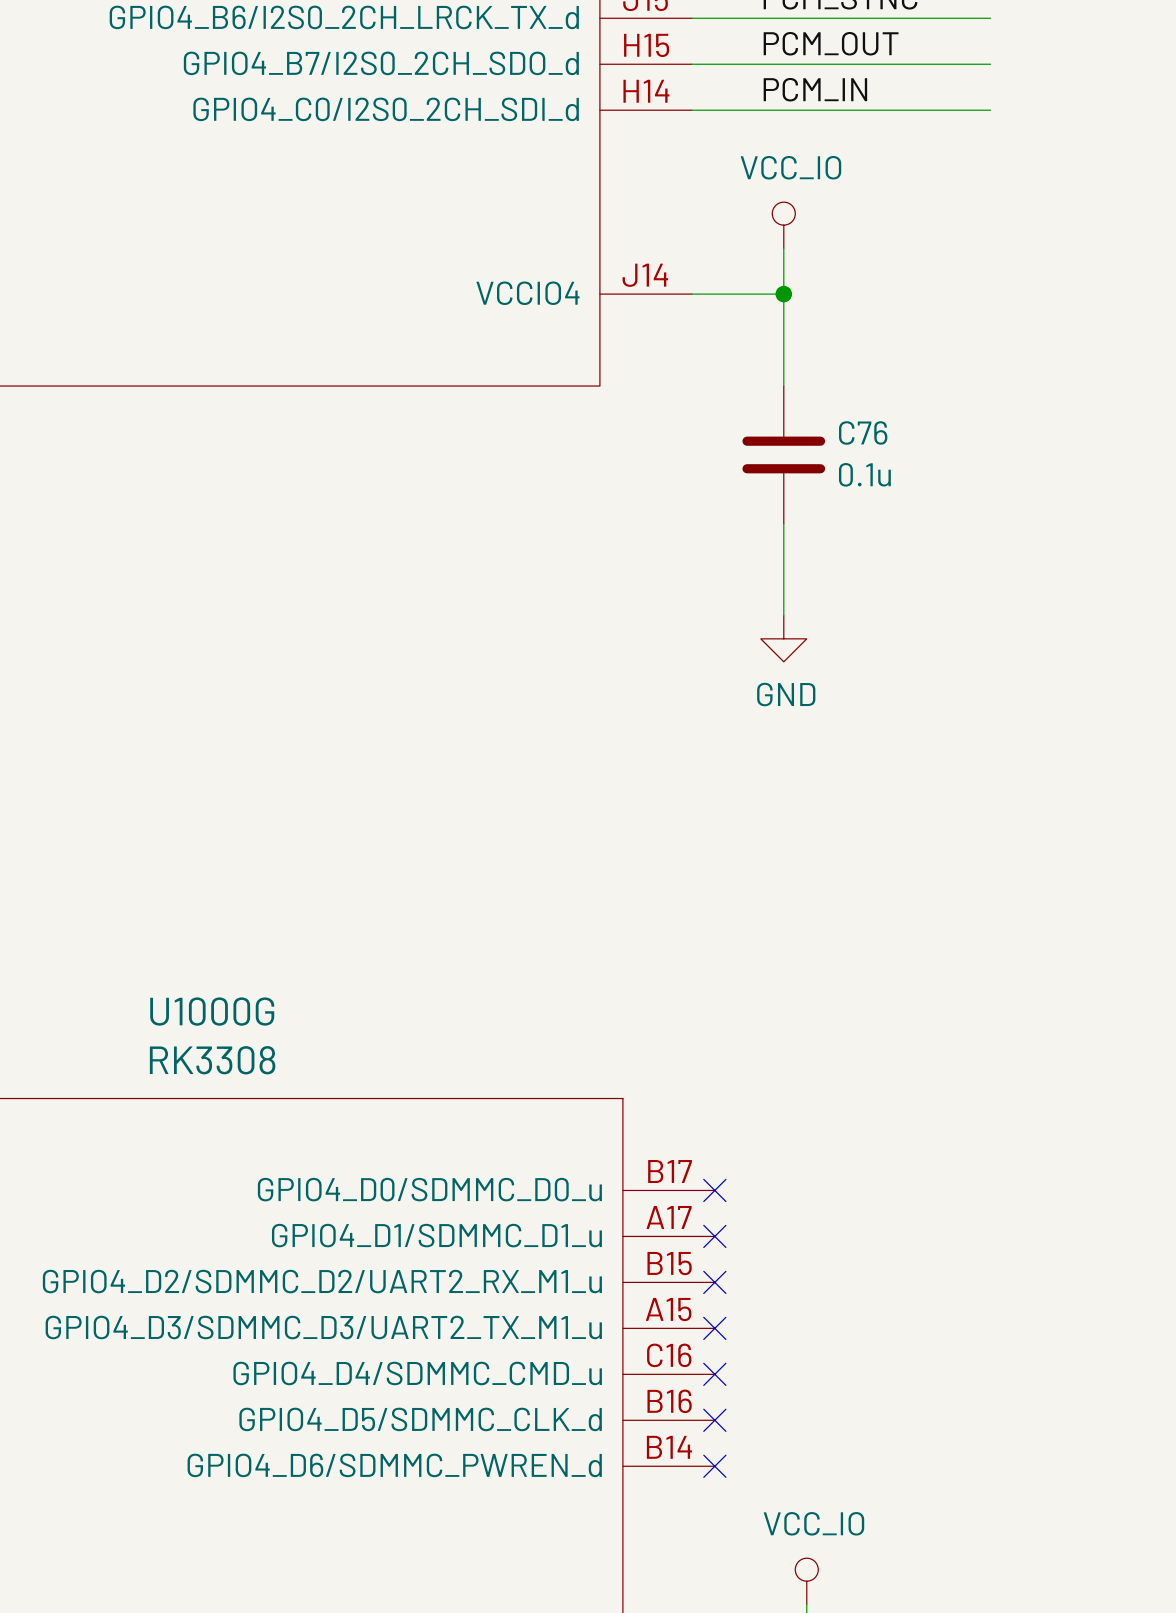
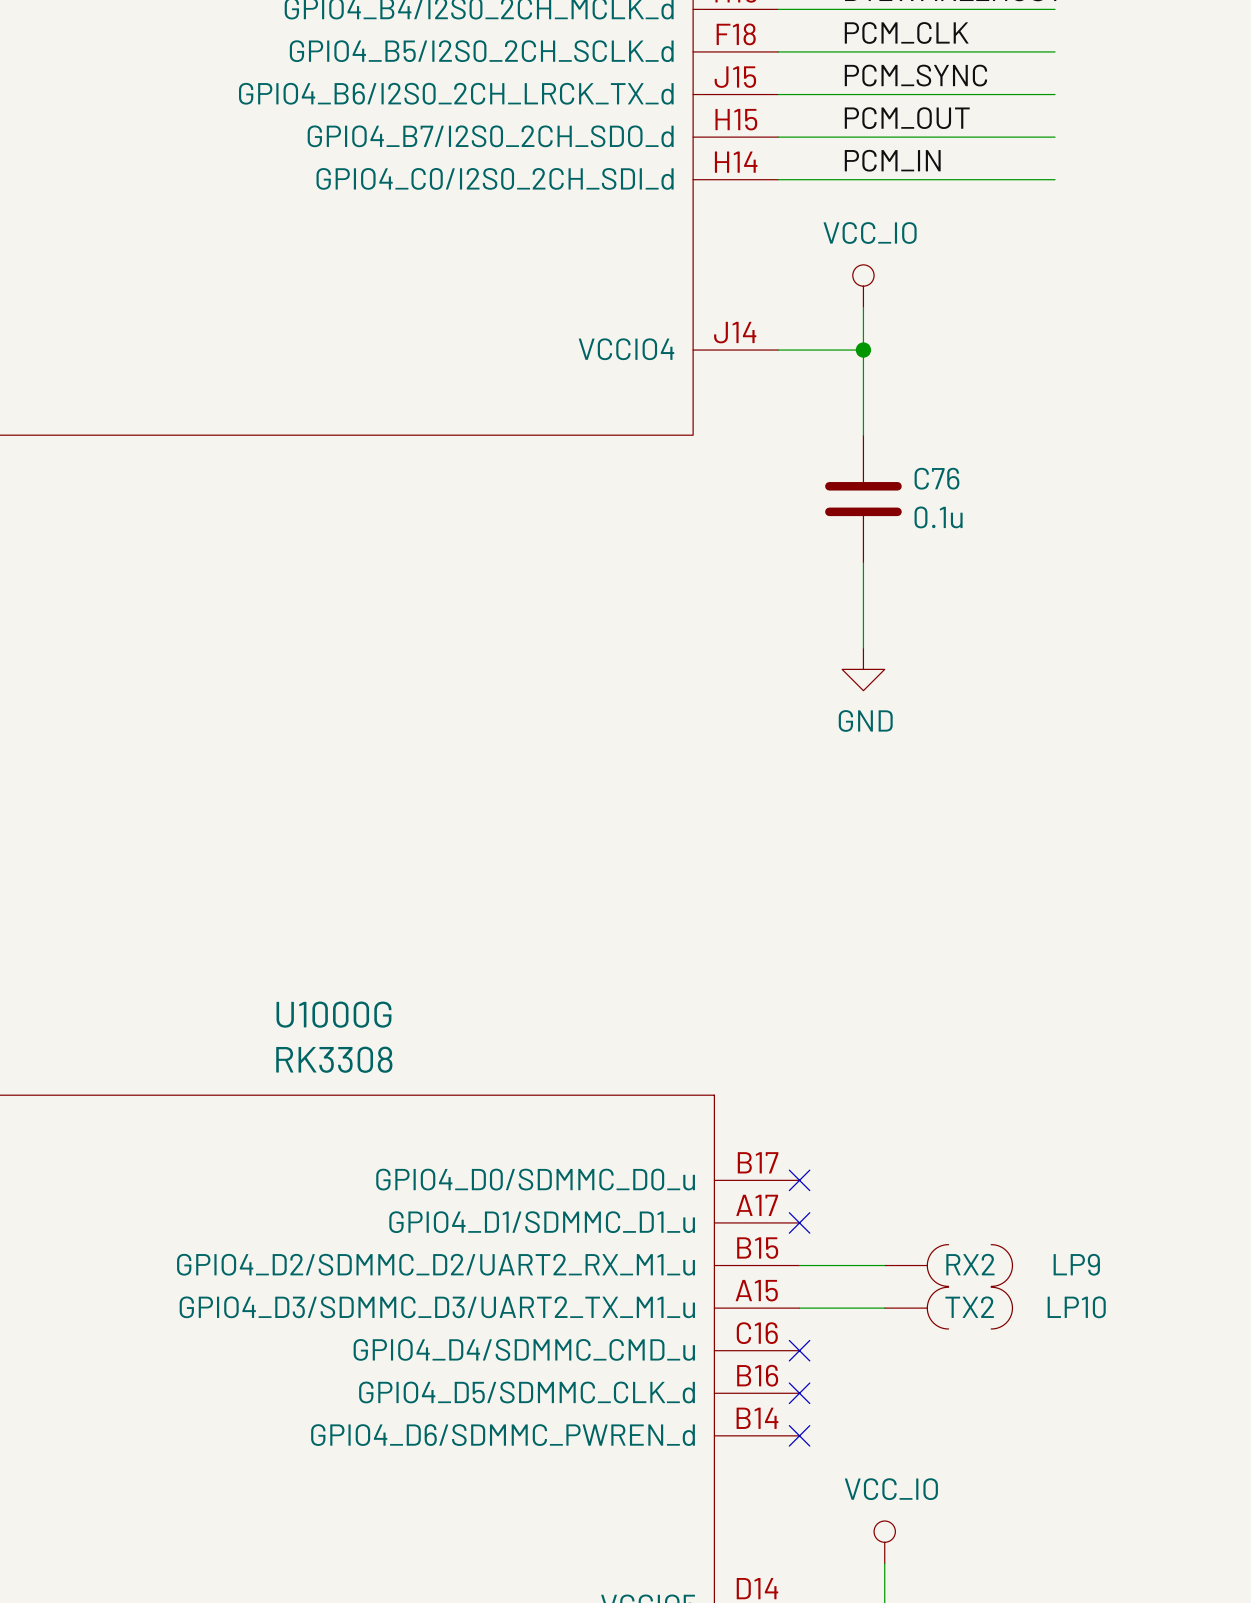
wire: none -> (799, 1265) (884, 1265)
no-connect mark: (714, 1282) -> none
LP9: none -> RX2 (948, 1265)
wire: none -> (799, 1308) (884, 1308)
no-connect mark: (714, 1328) -> none
LP10: none -> TX2 (948, 1308)

